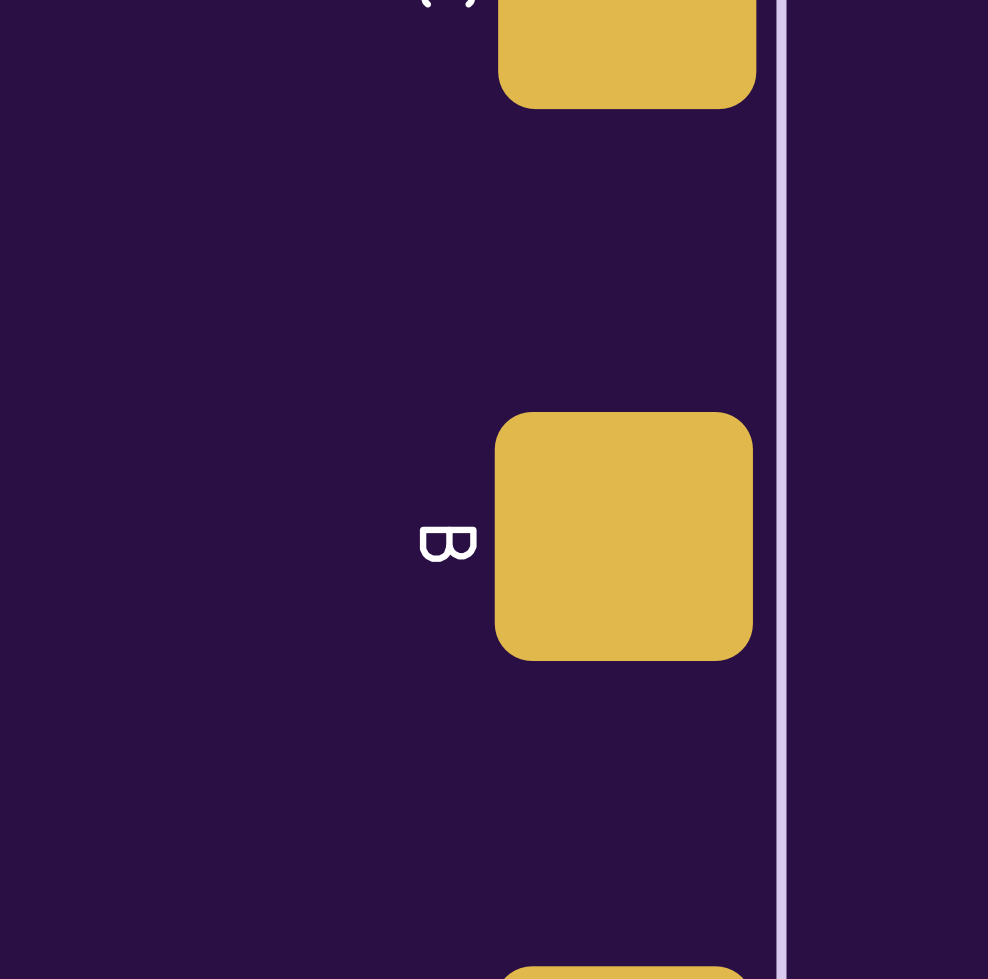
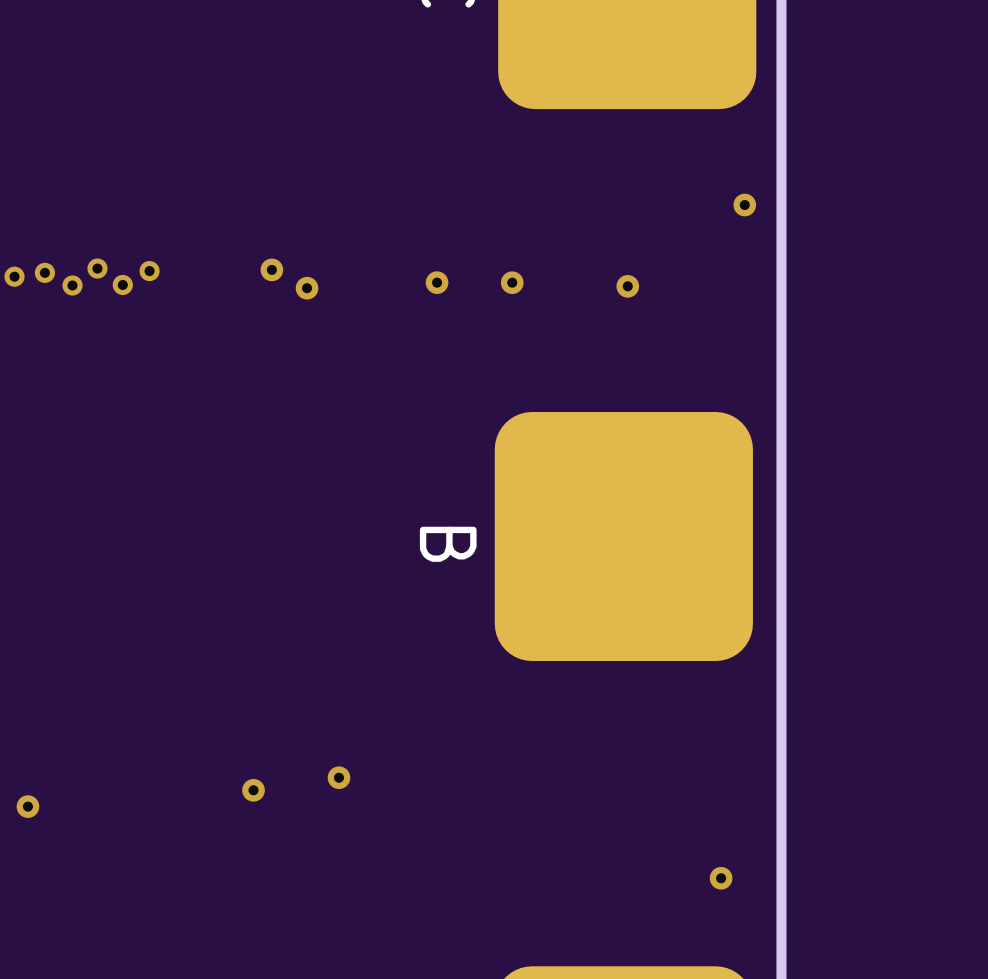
via: none -> (744, 205)
via: none -> (97, 268)
via: none -> (271, 269)
via: none -> (149, 271)
via: none -> (44, 272)
via: none -> (14, 276)
via: none -> (437, 282)
via: none -> (512, 282)
via: none -> (122, 284)
via: none -> (72, 285)
via: none -> (627, 286)
via: none -> (307, 288)
via: none -> (339, 777)
via: none -> (253, 790)
via: none -> (27, 806)
via: none -> (721, 878)

